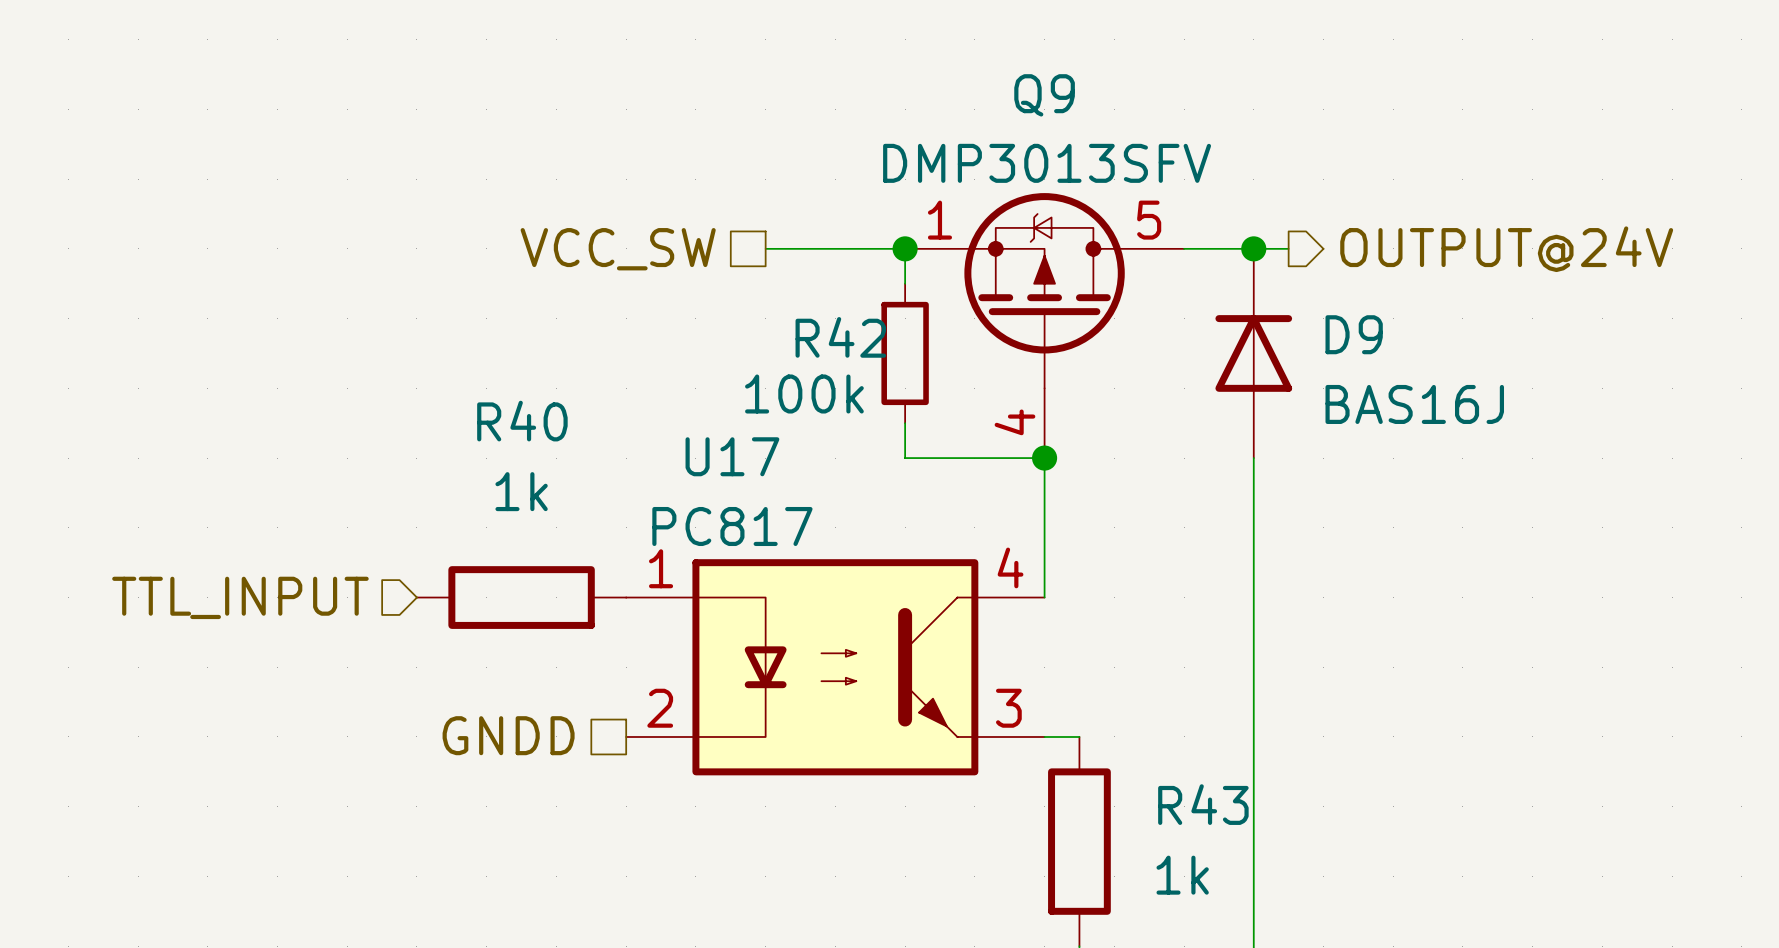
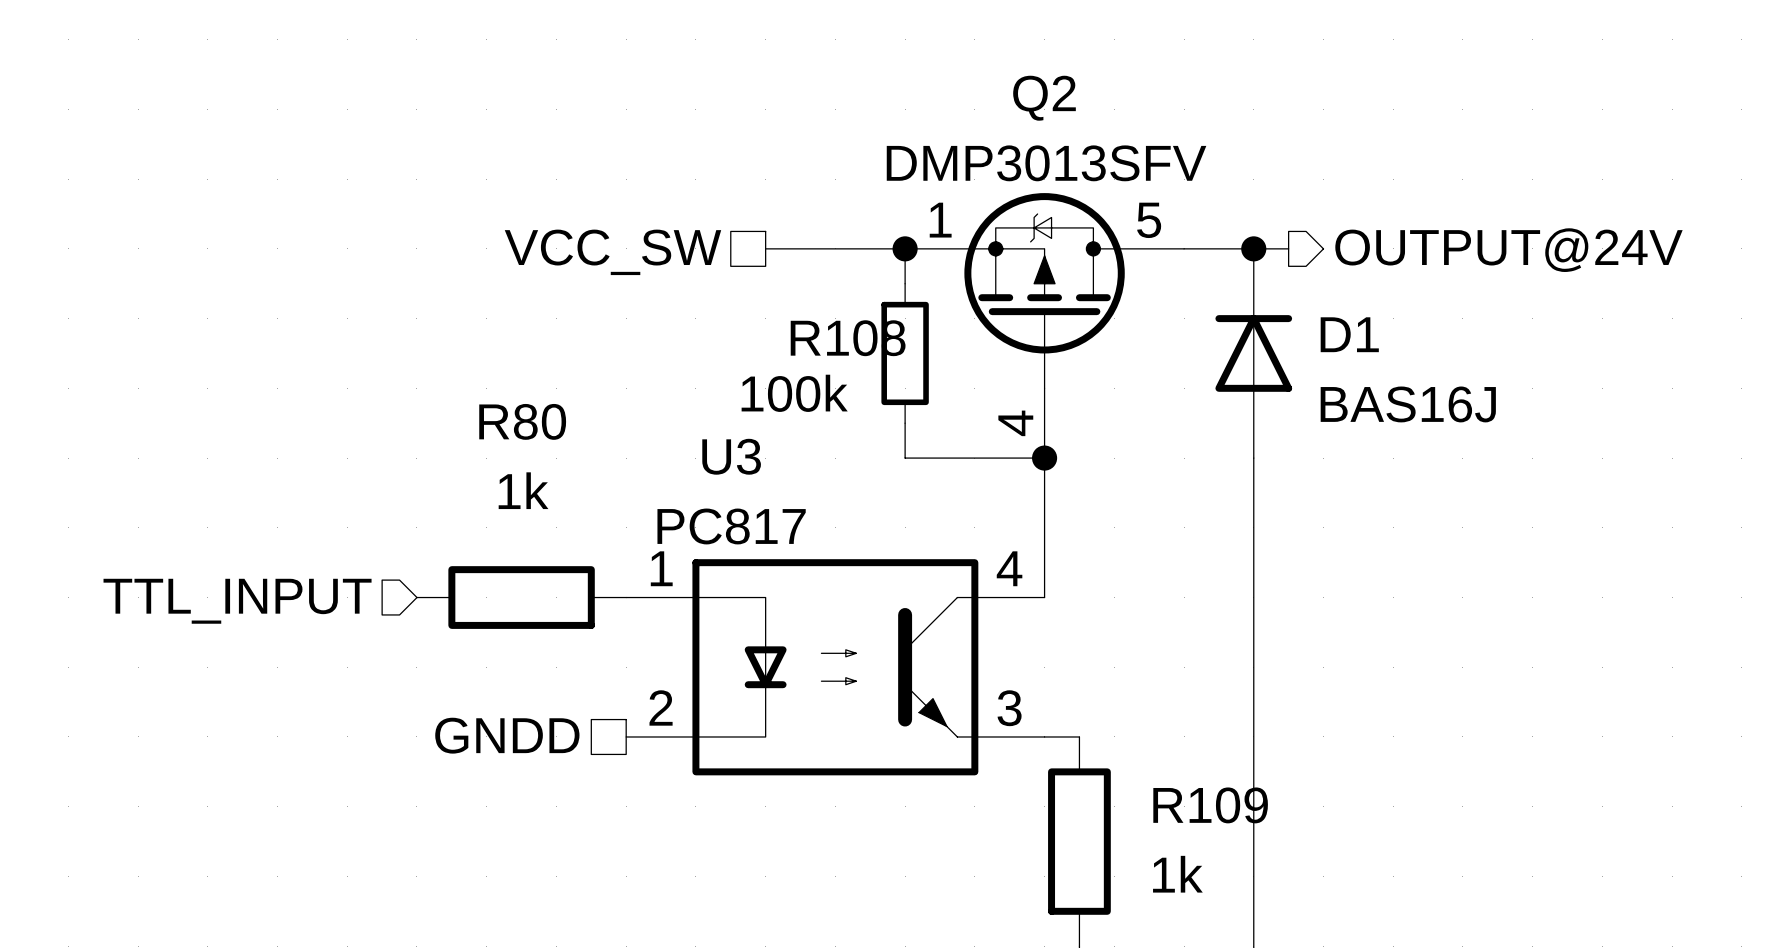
Q9 name: Q9 (1044, 95) -> Q2 (1044, 98)
D9 name: D9 (1354, 334) -> D1 (1349, 334)
R42 name: R42 (840, 337) -> R108 (848, 338)
R40 name: R40 (522, 421) -> R80 (522, 421)
U17 name: U17 (732, 456) -> U3 (731, 456)
R43 name: R43 (1203, 804) -> R109 (1210, 805)

